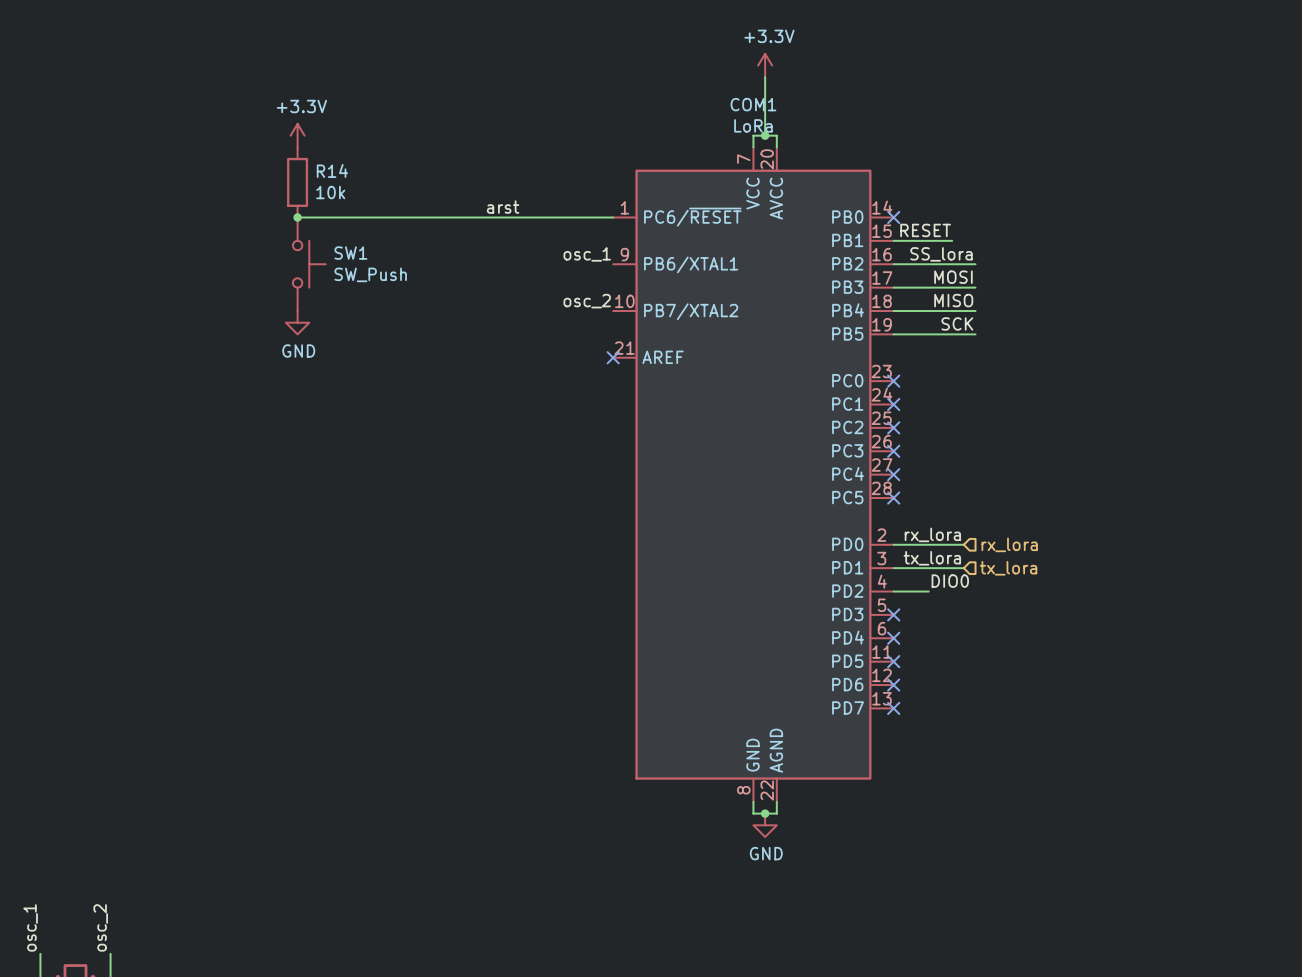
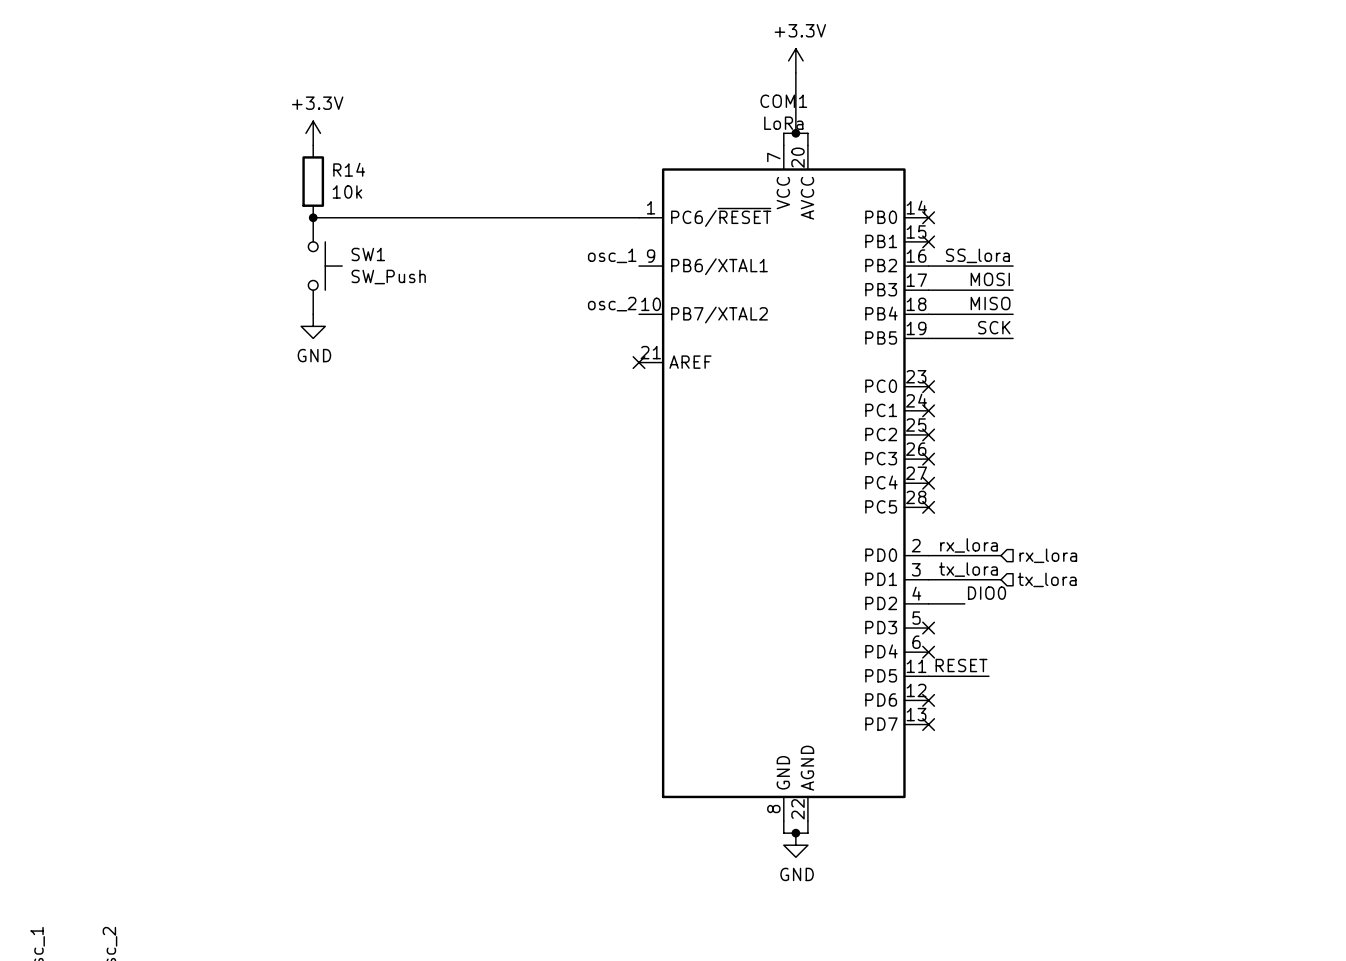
label: arst (503, 207) -> none
label: RESET (925, 230) -> none
wire: (893, 240) (952, 240) -> none
no-connect mark: none -> (928, 241)
label: none -> RESET (961, 665)
wire: none -> (928, 676) (988, 676)
no-connect mark: (893, 661) -> none

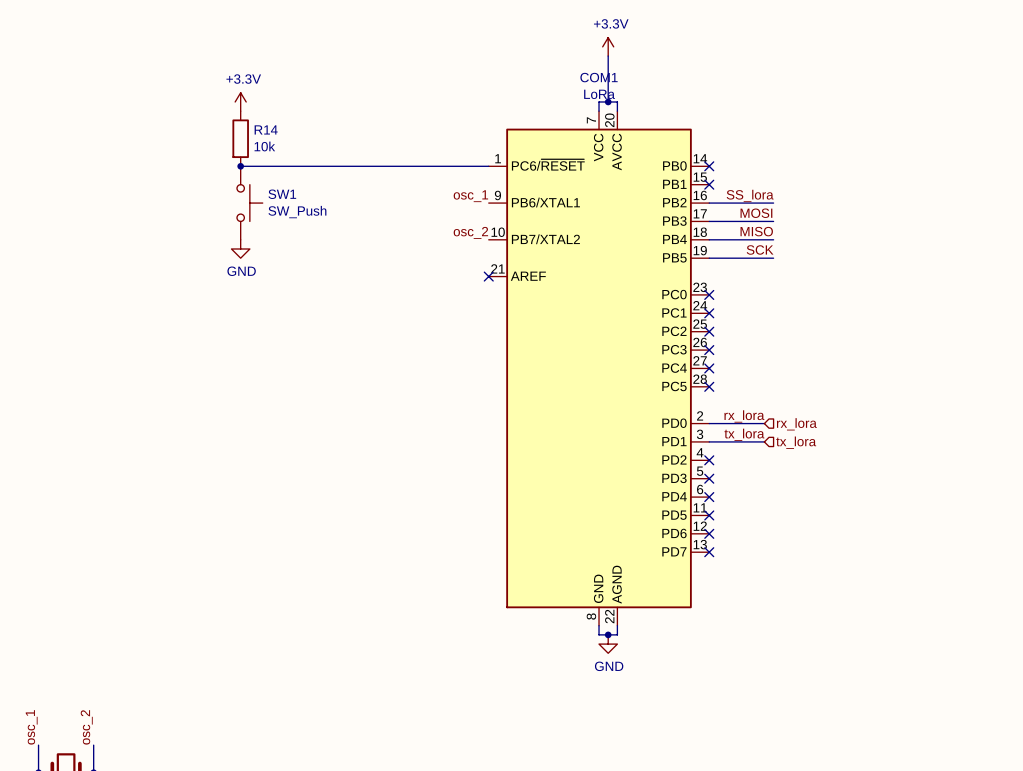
label: DIO0 (987, 593) -> none
wire: (928, 603) (964, 603) -> none
no-connect mark: none -> (709, 460)
label: RESET (961, 665) -> none
wire: (928, 676) (988, 676) -> none
no-connect mark: none -> (709, 515)

